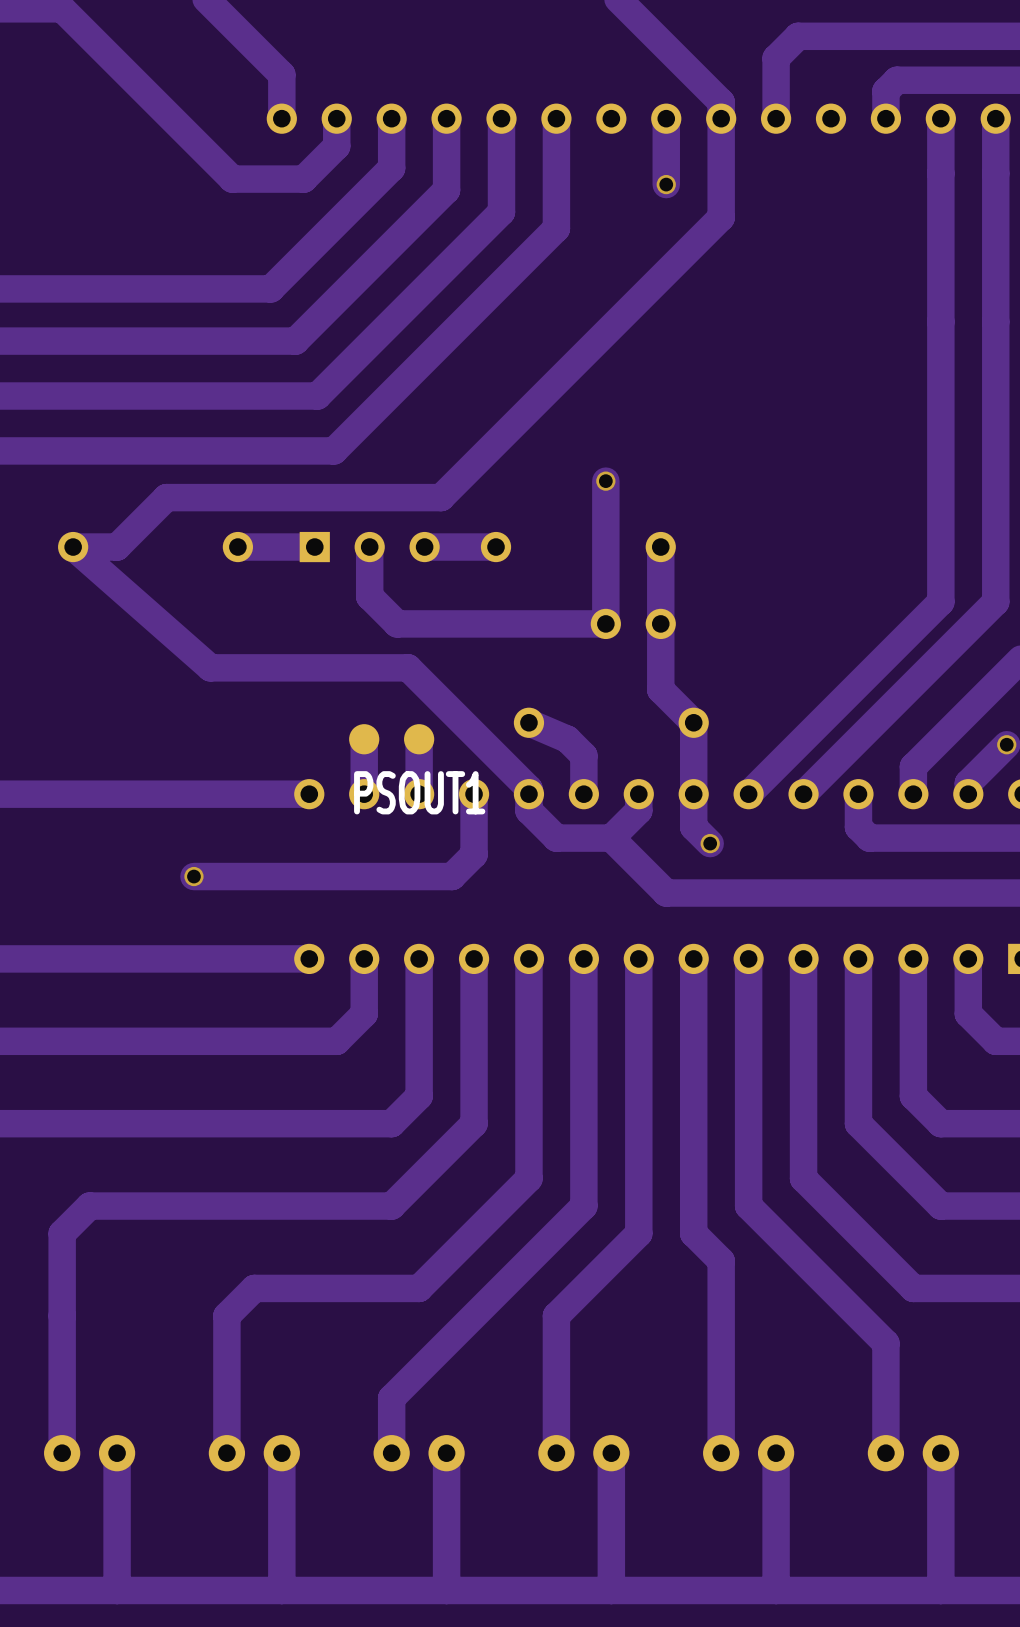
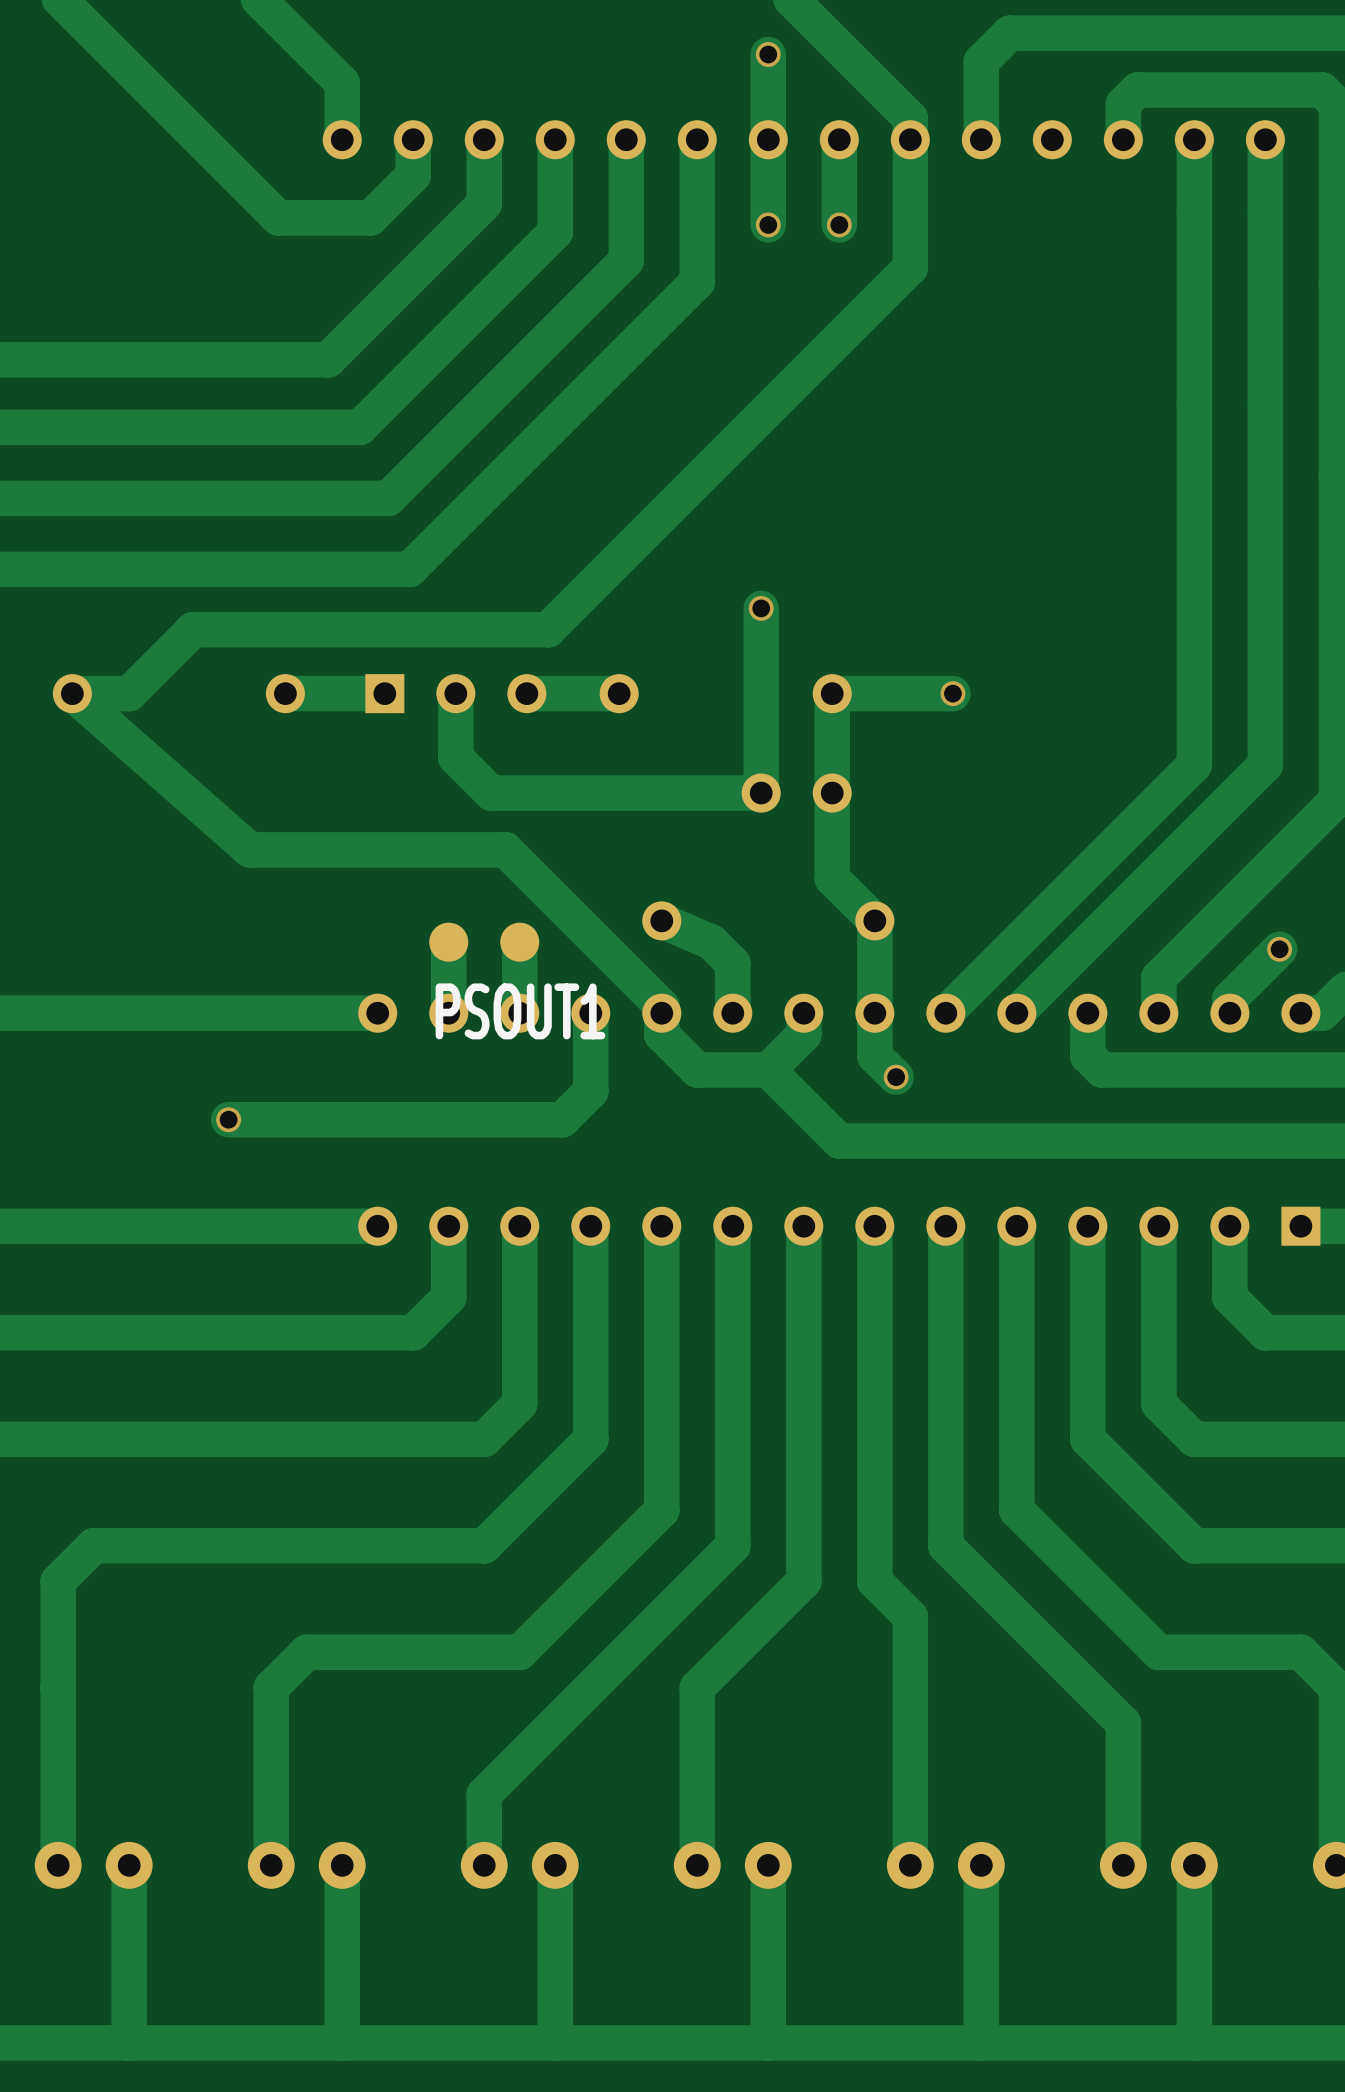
track: none -> (768, 54) (768, 224)
via: none -> (768, 54)
via: none -> (768, 224)
track: none -> (952, 693) (832, 693)
via: none -> (952, 693)

